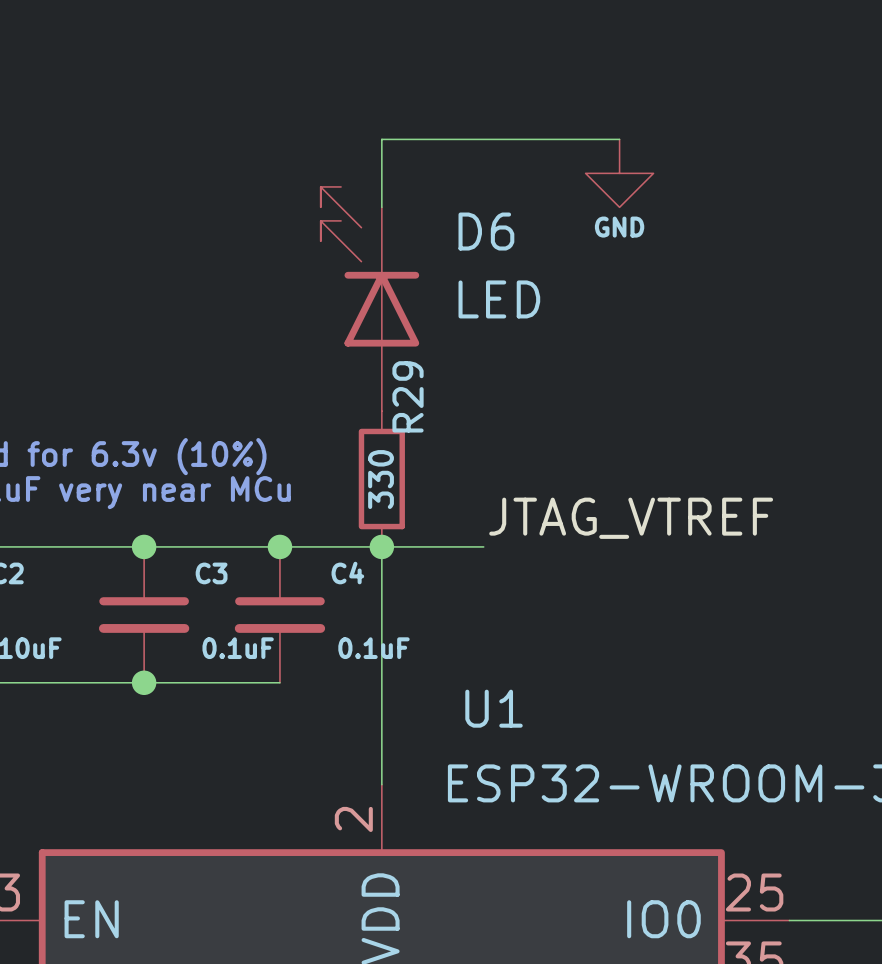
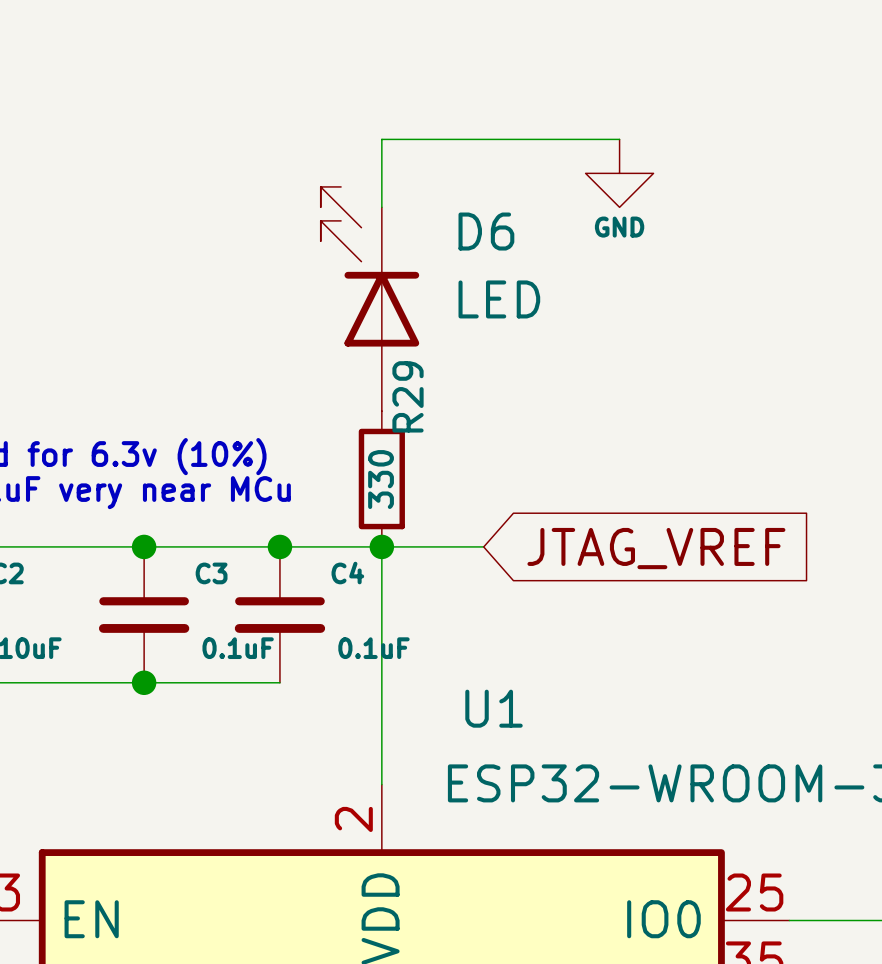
label: JTAG_VTREF (631, 518) -> none
global label: none -> JTAG_VREF (656, 548)

